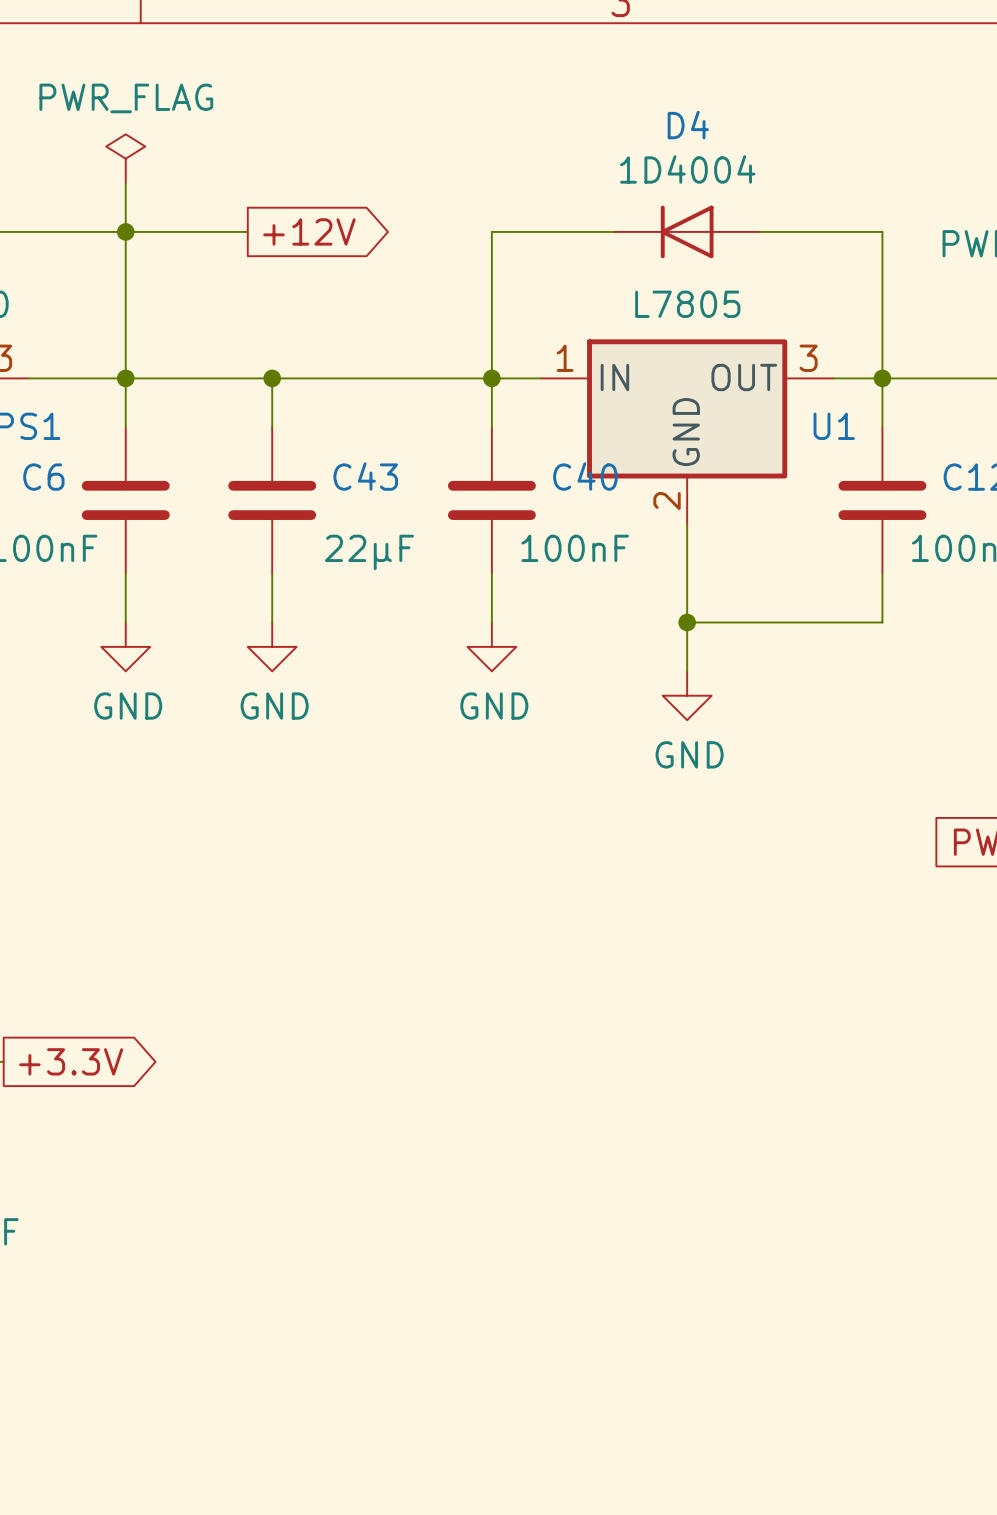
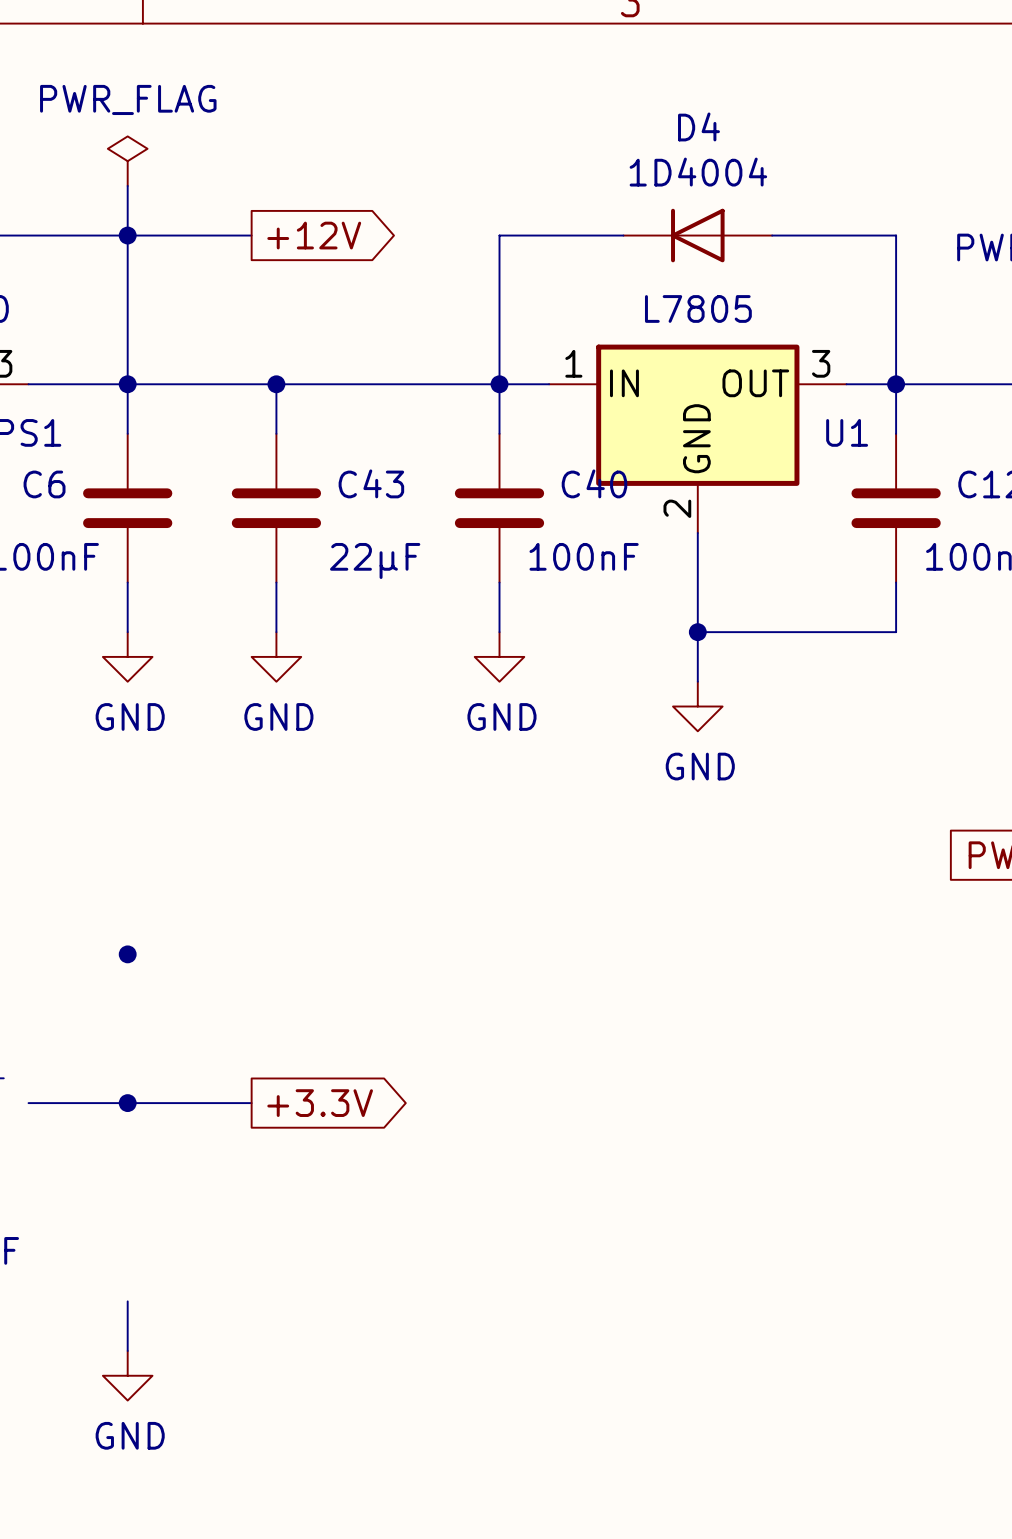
junction: none -> (127, 954)
global label position: +3.3V (71, 1061) -> +3.3V (320, 1103)
wire: none -> (28, 1103) (251, 1103)
junction: none -> (127, 1103)
wire: none -> (127, 1301) (127, 1350)
power symbol: none -> GND (127, 1375)

